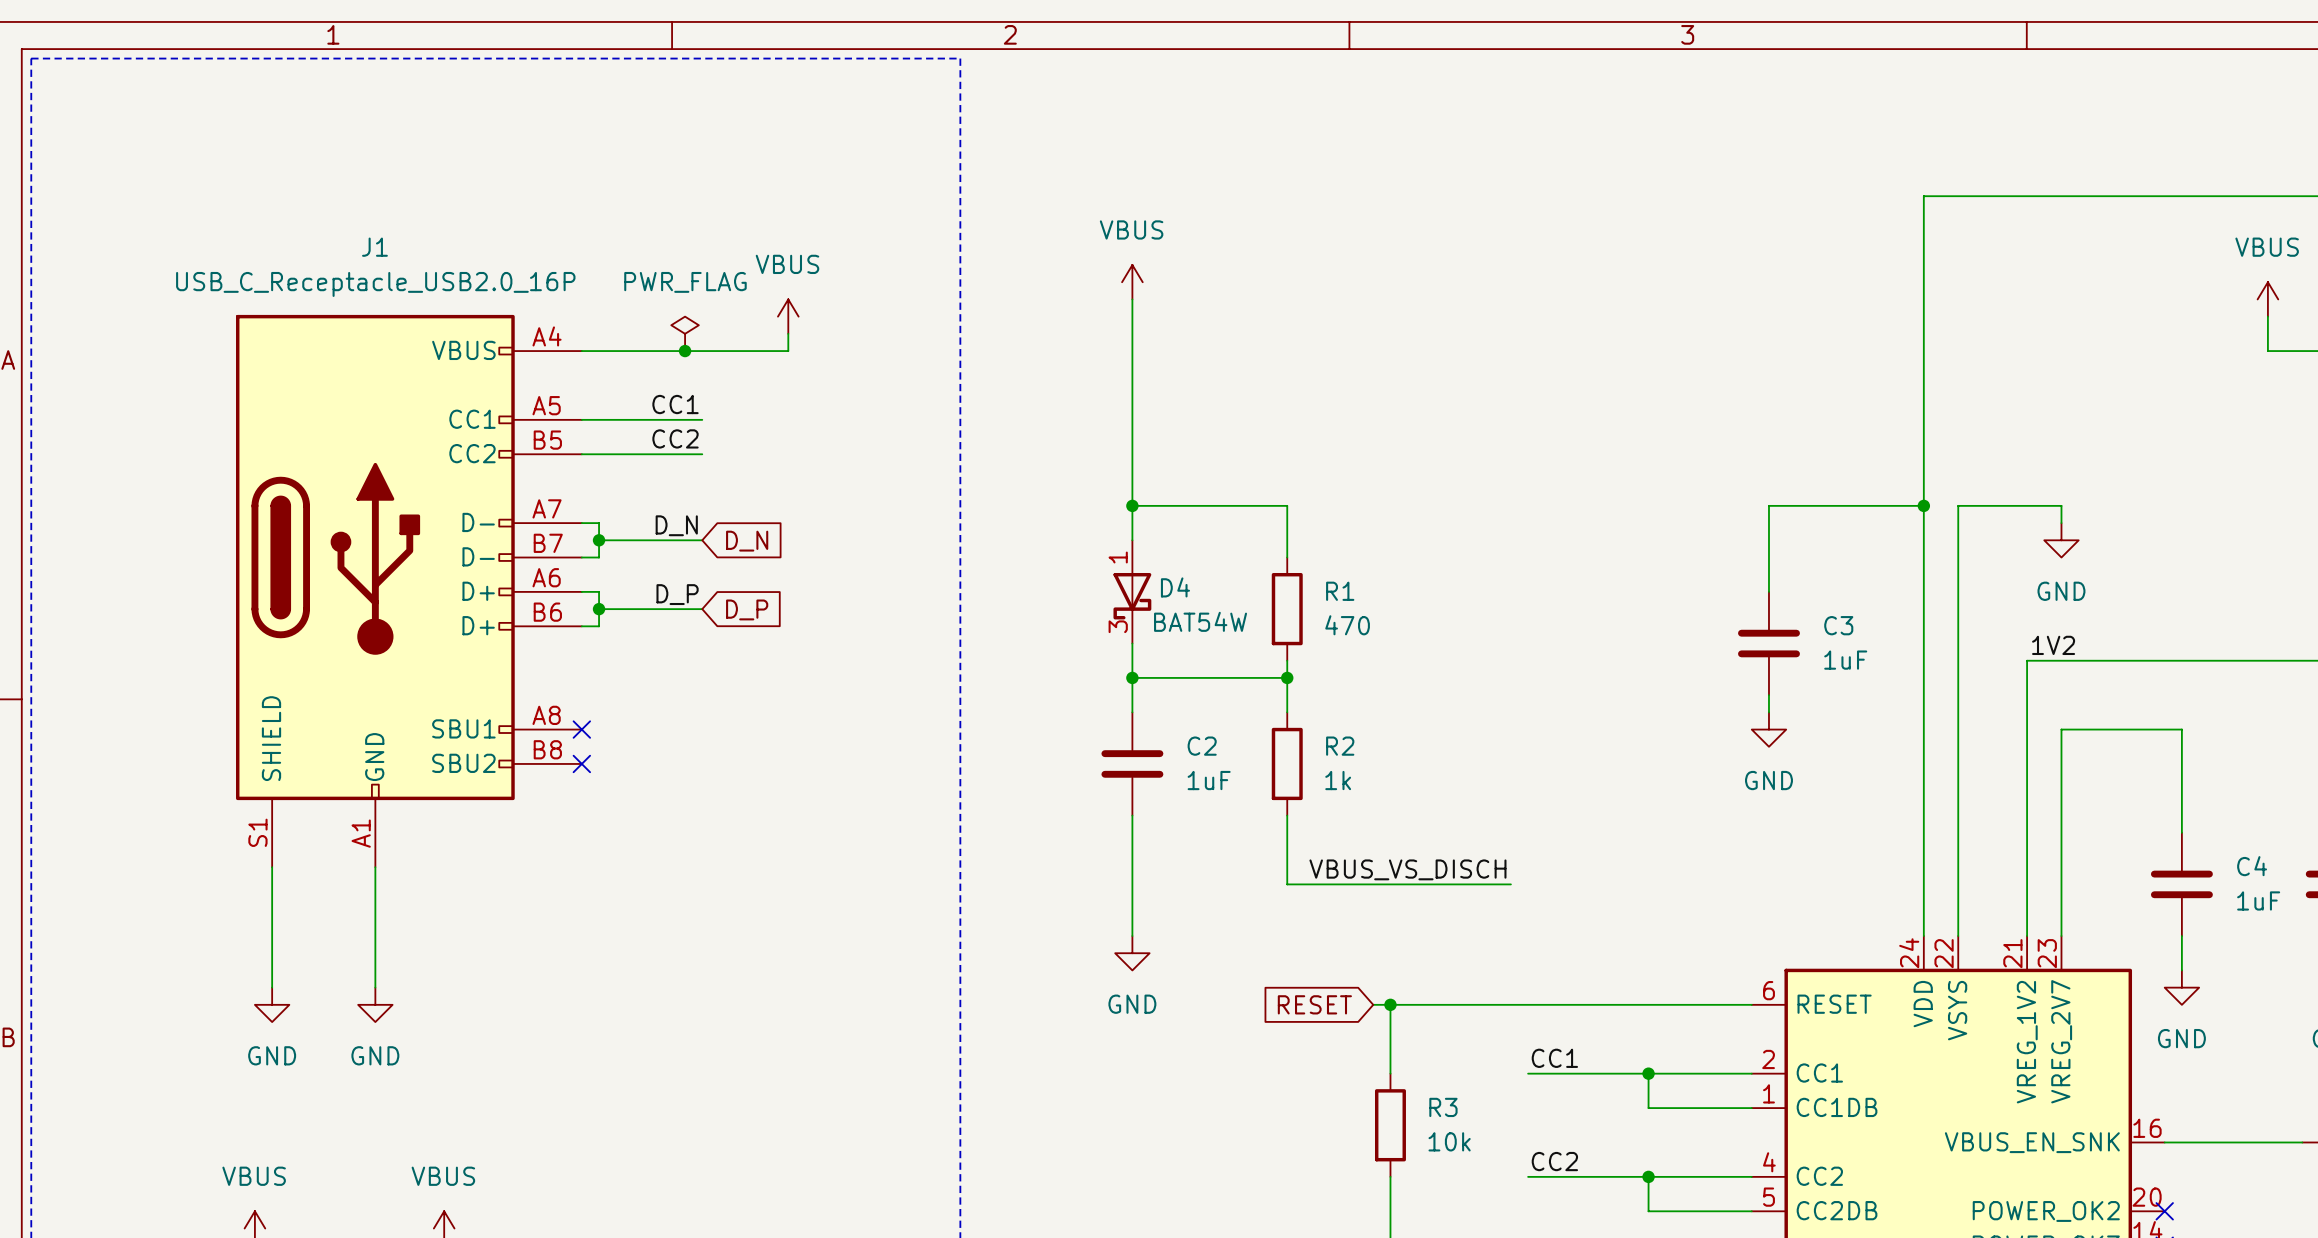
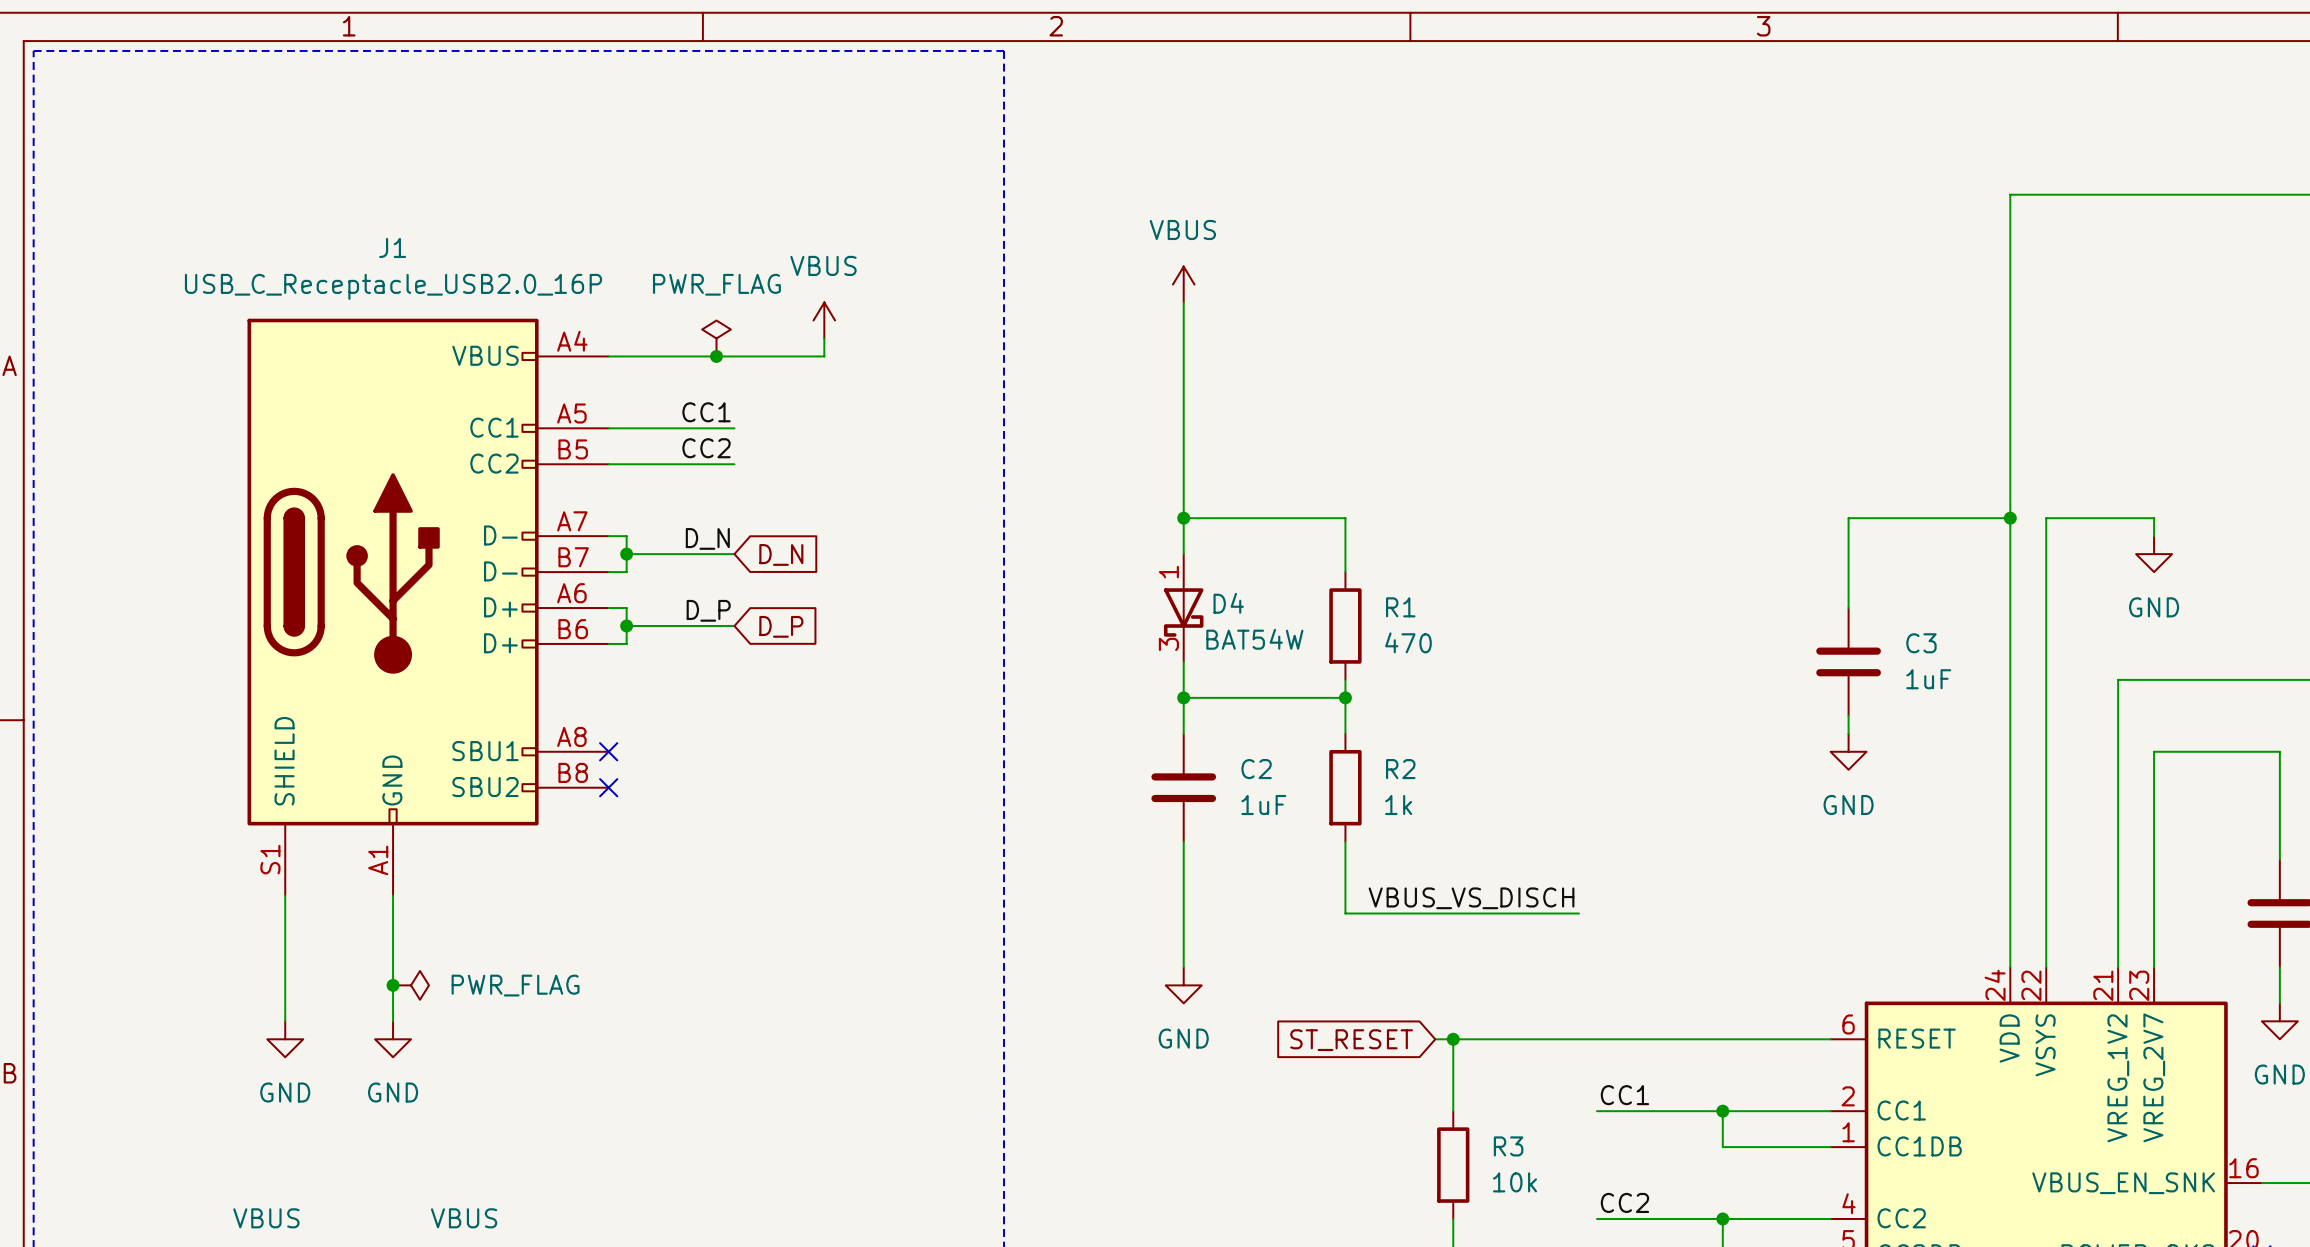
label: 1V2 (2053, 645) -> none
junction: none -> (393, 985)
power symbol: none -> PWR_FLAG (411, 985)
global label: RESET (1314, 1004) -> ST_RESET (1351, 1040)

